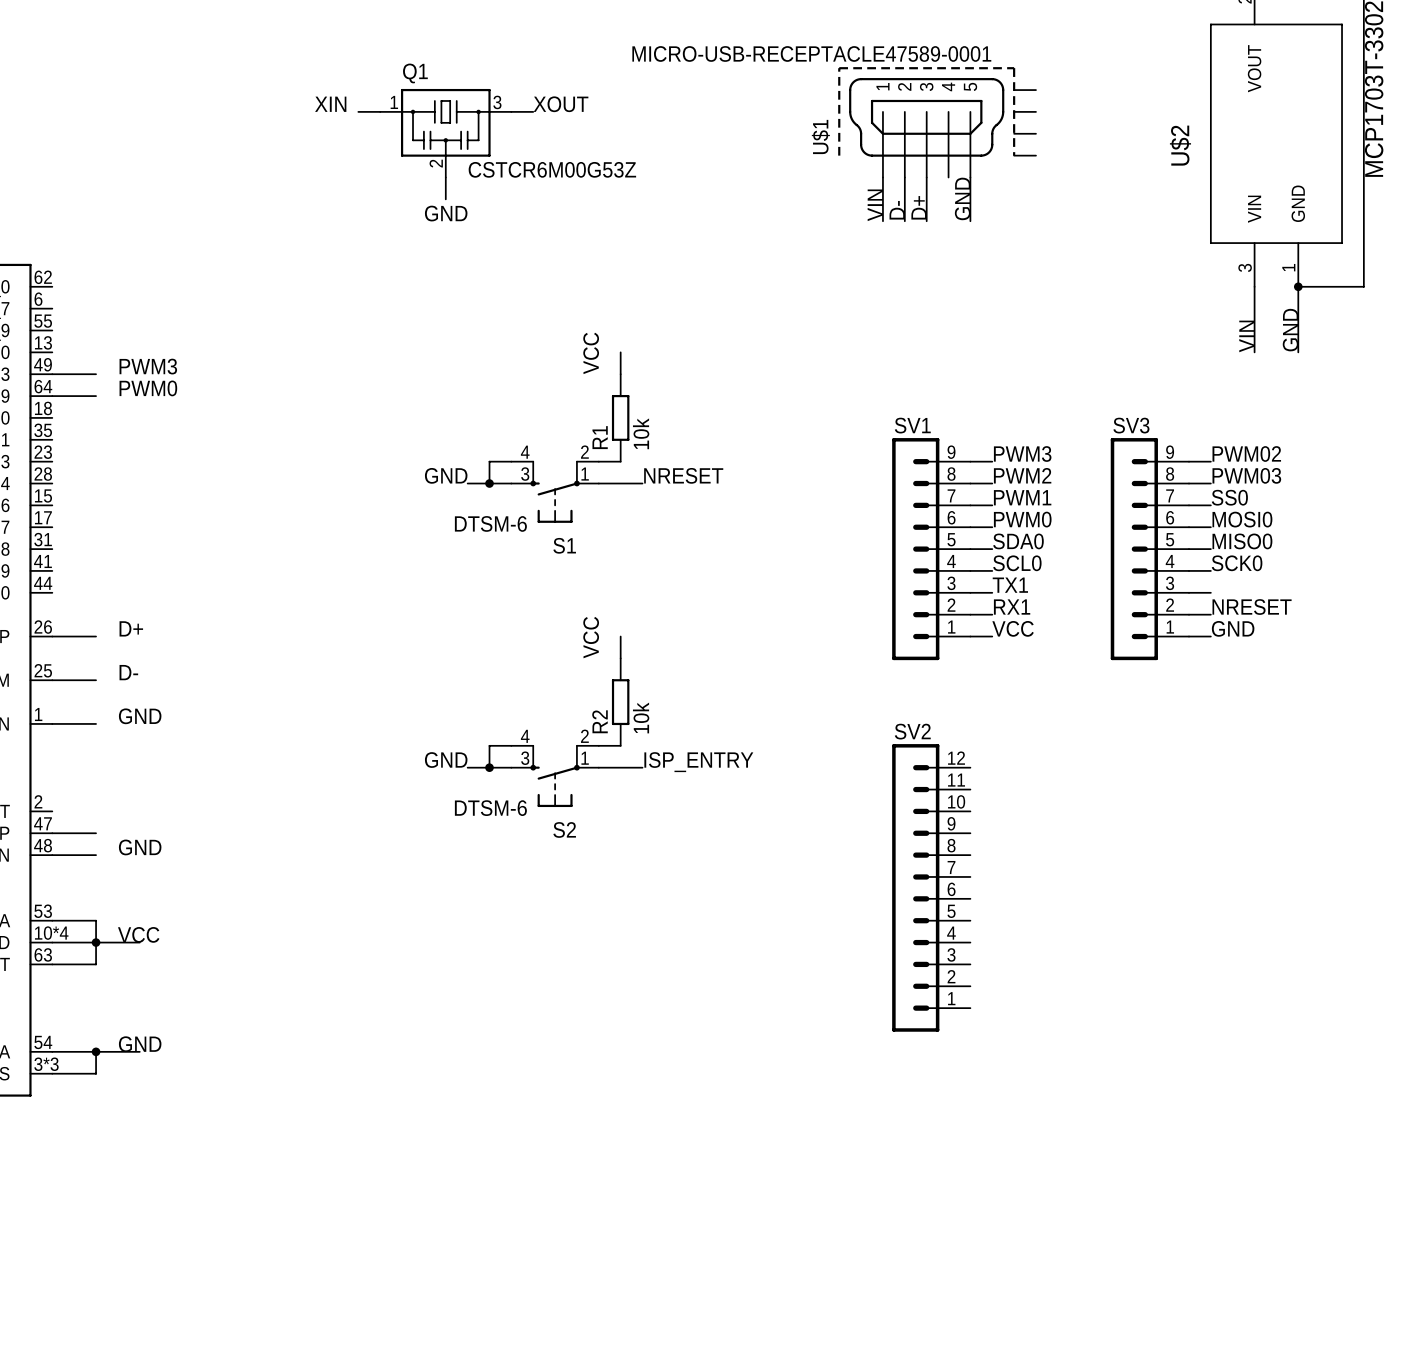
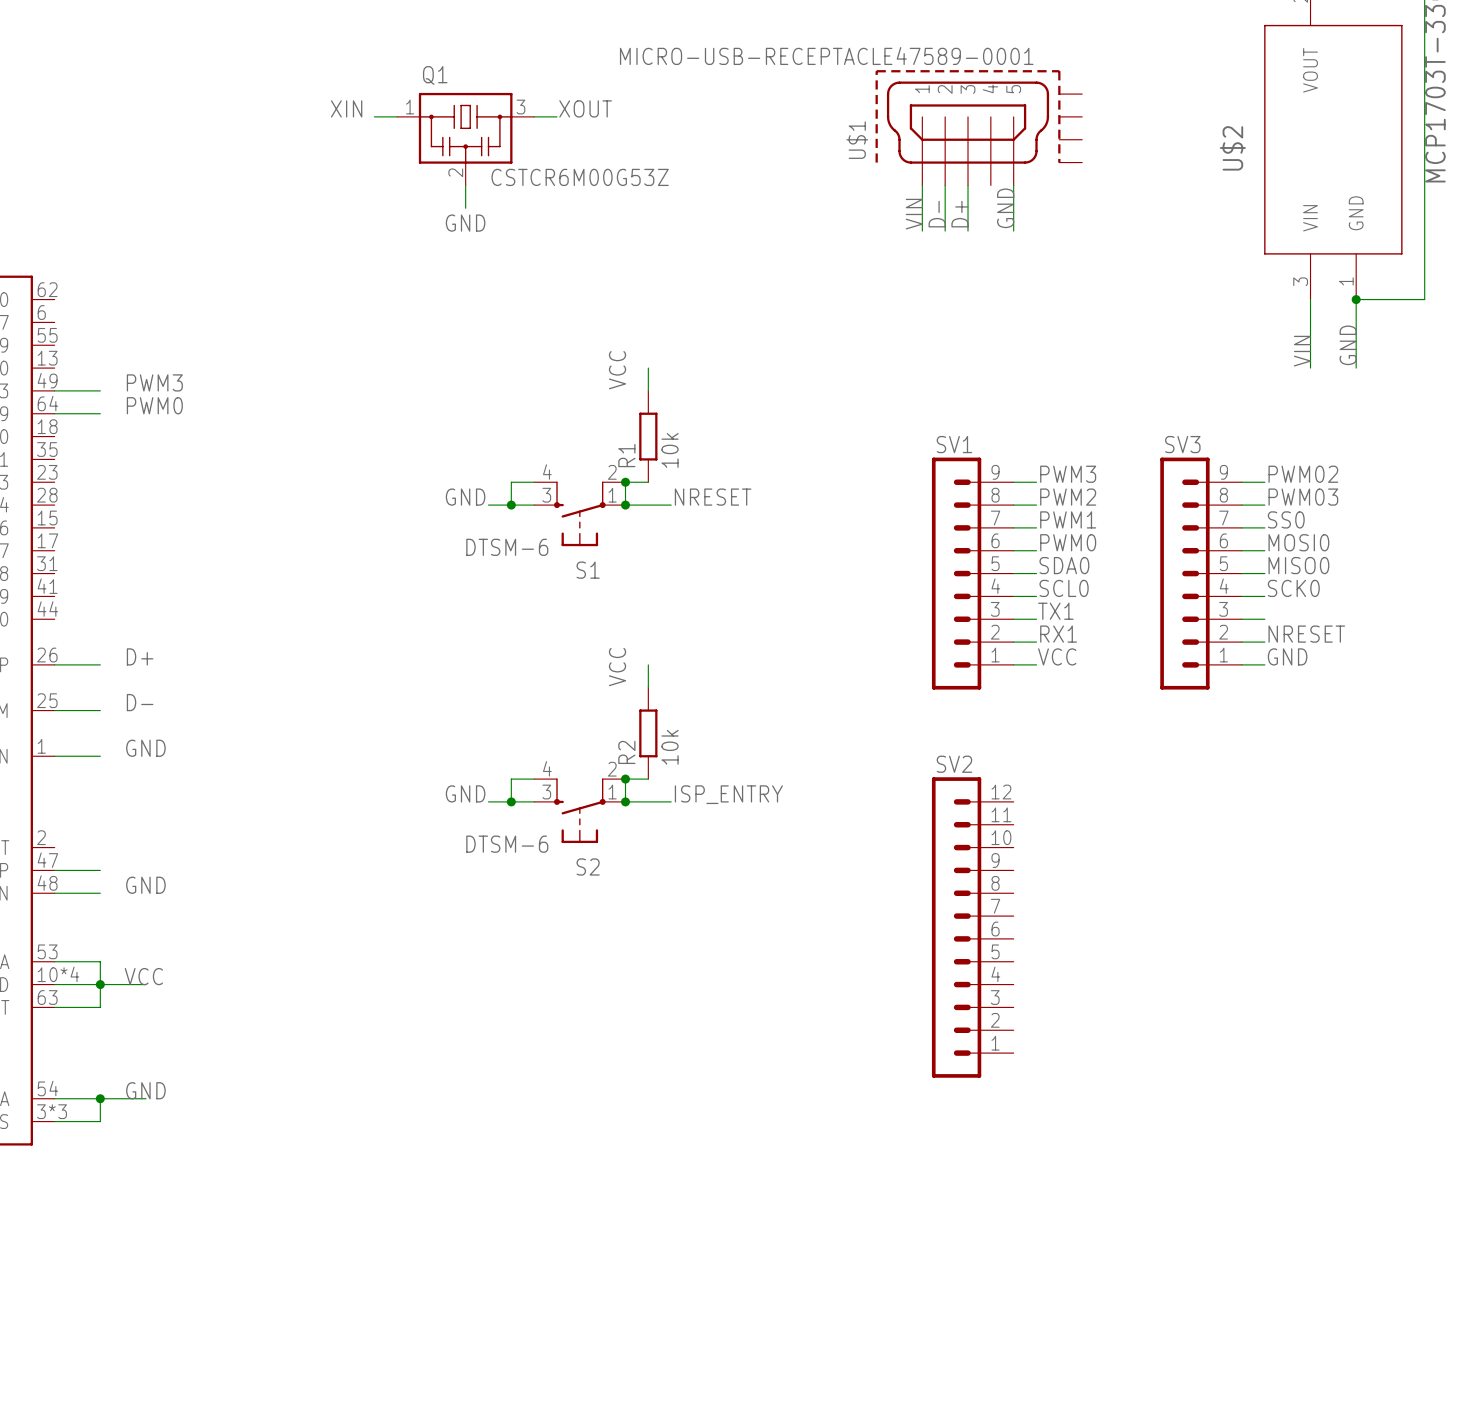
wire: none -> (625, 482) (625, 505)
junction: none -> (625, 482)
junction: none -> (625, 505)
wire: none -> (625, 779) (625, 801)
junction: none -> (625, 779)
junction: none -> (625, 801)

